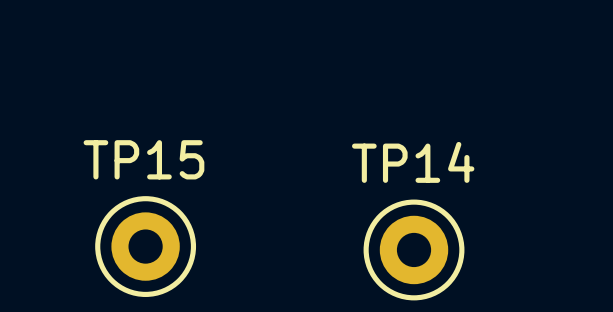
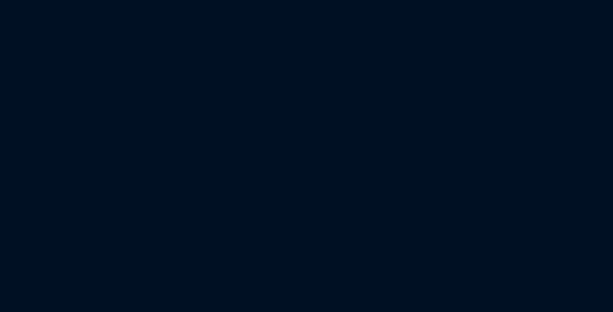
TP15: (145, 246) -> none
TP14: (414, 249) -> none

